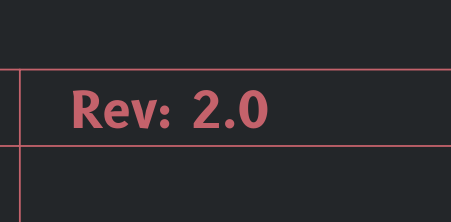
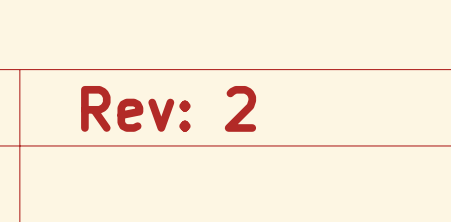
title block: Rev: 2.0 (170, 109) -> Rev: 2 (168, 108)

